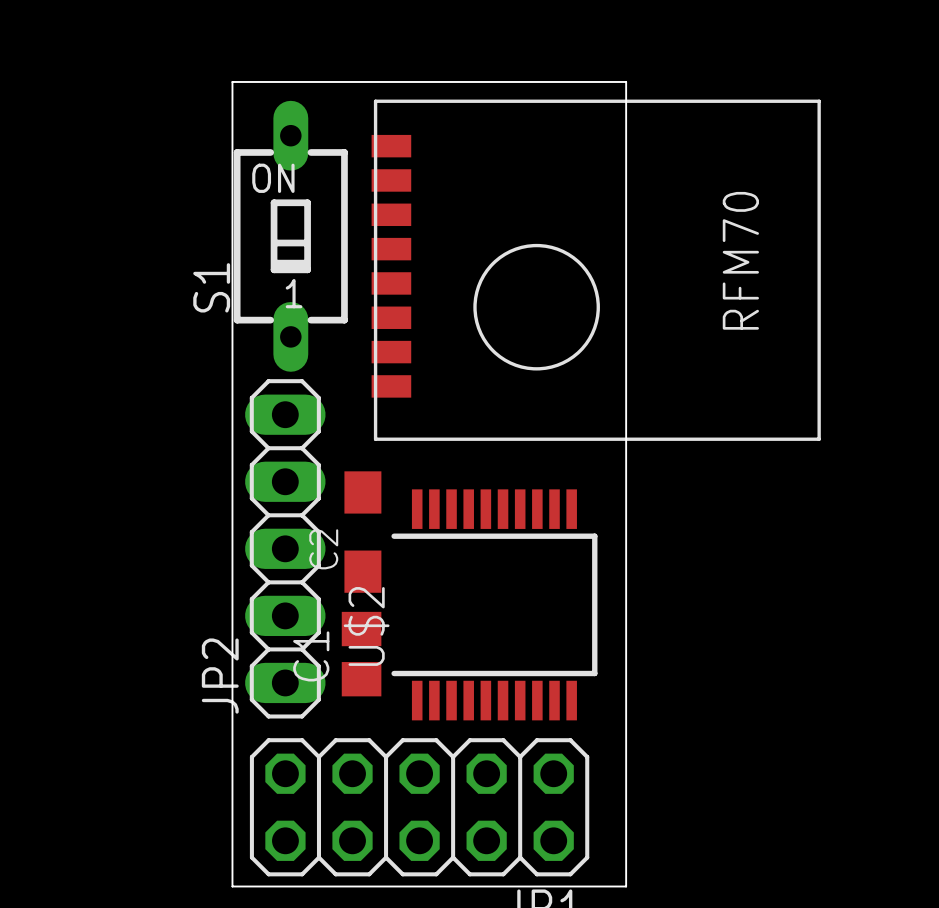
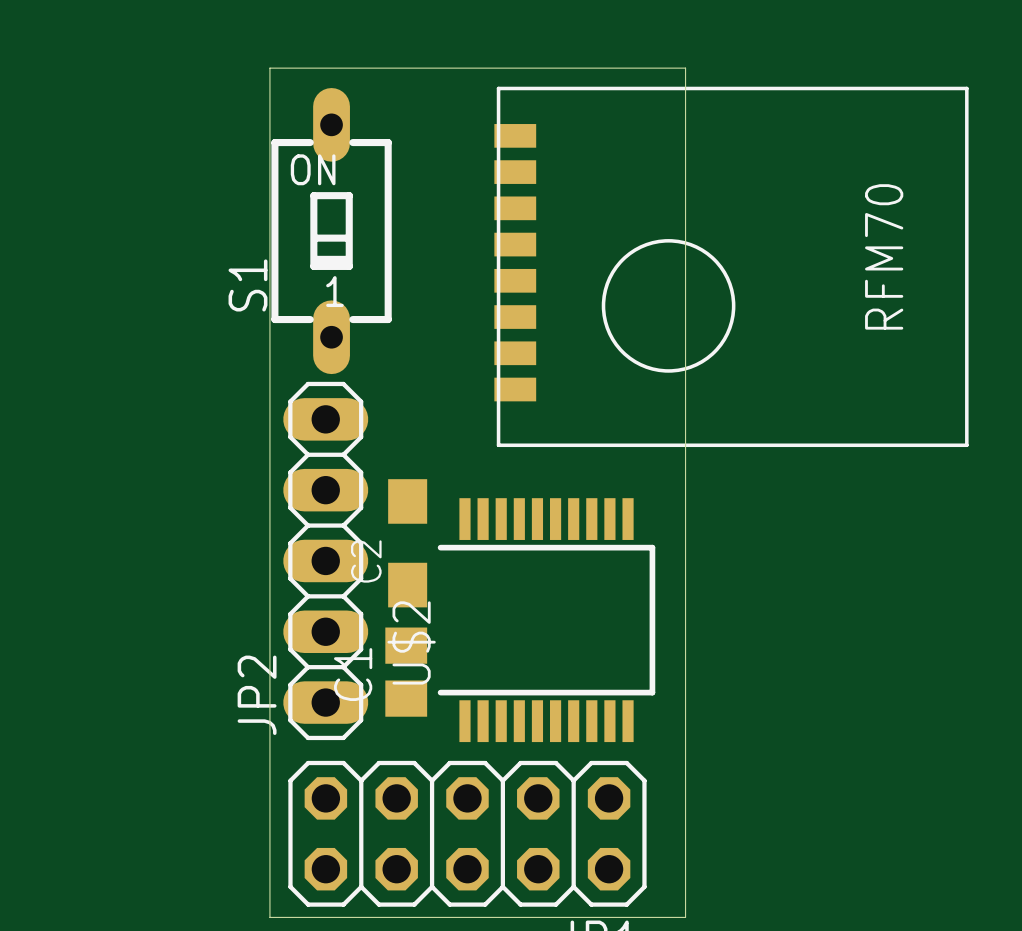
part position: (596, 270) -> (731, 266)

